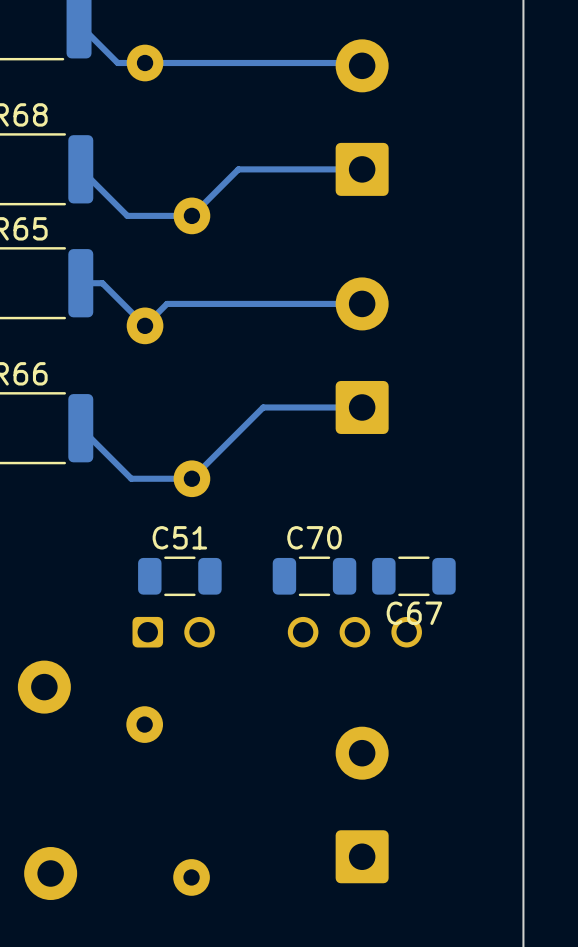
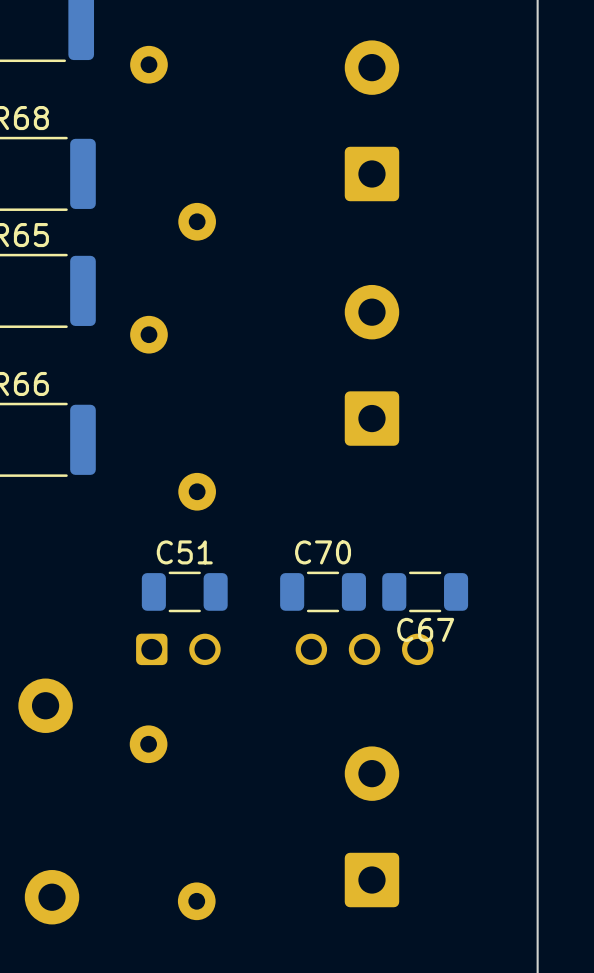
bottom track: (79, 24) (117, 63) (359, 63) (362, 65) -> none
bottom track: (80, 169) (127, 215) (191, 215) (238, 169) (362, 169) -> none
bottom track: (80, 283) (102, 283) (145, 325) (166, 303) (362, 303) -> none
bottom track: (362, 407) (263, 407) (191, 478) (131, 478) (80, 428) -> none

